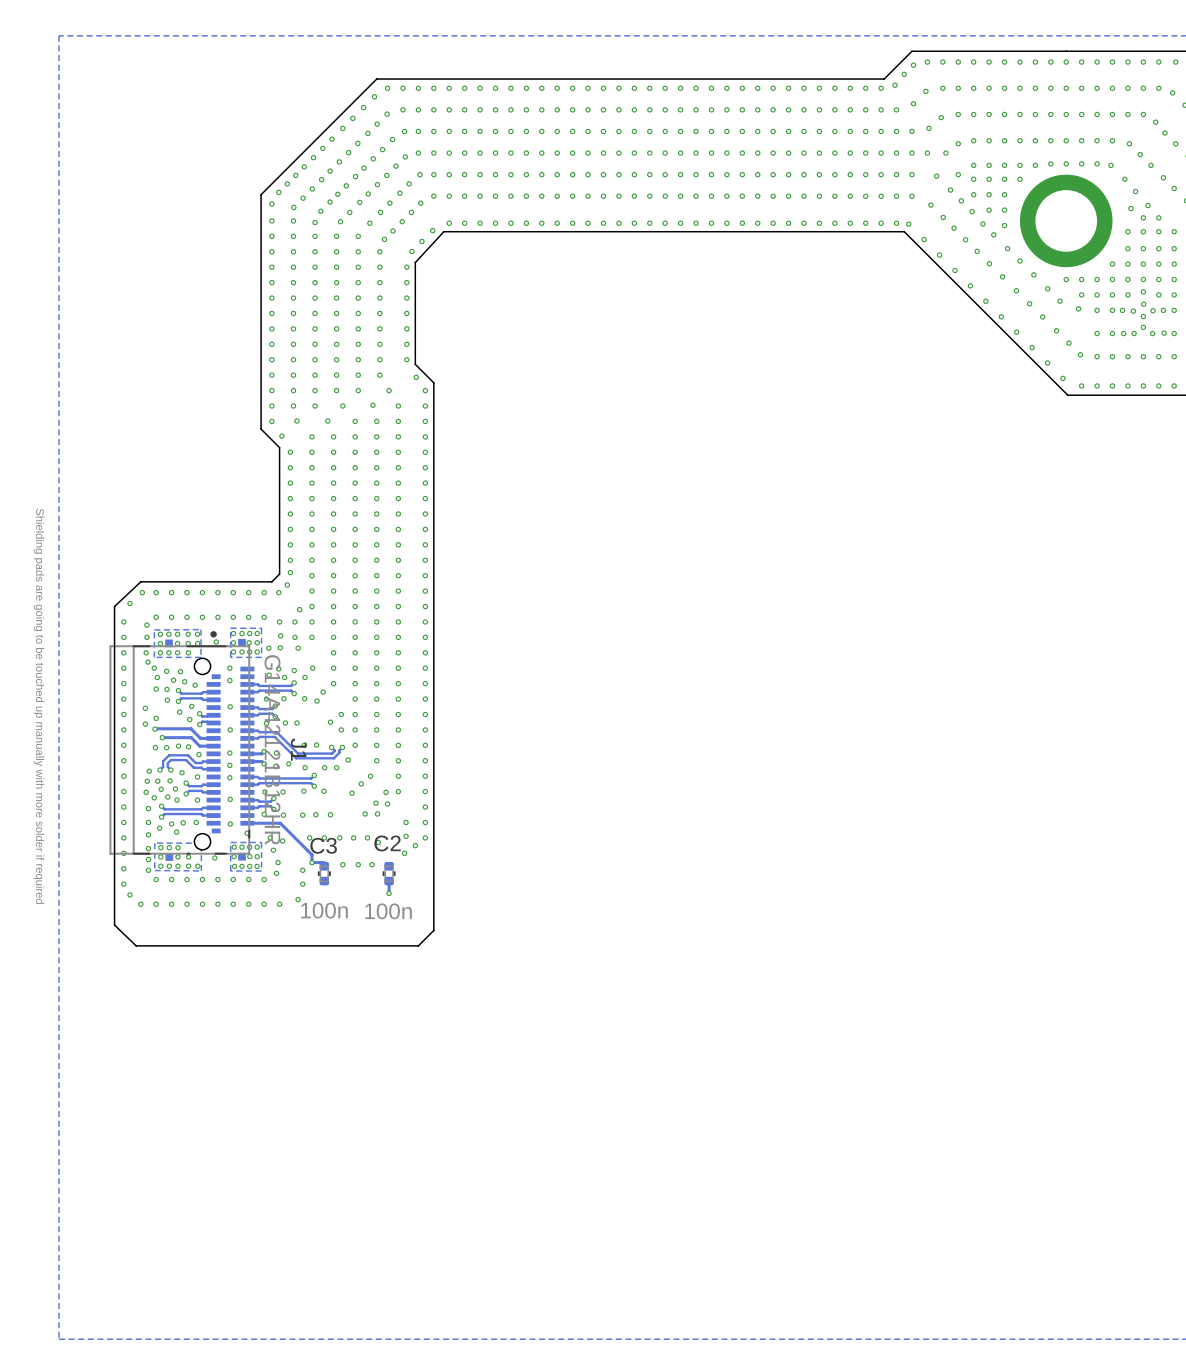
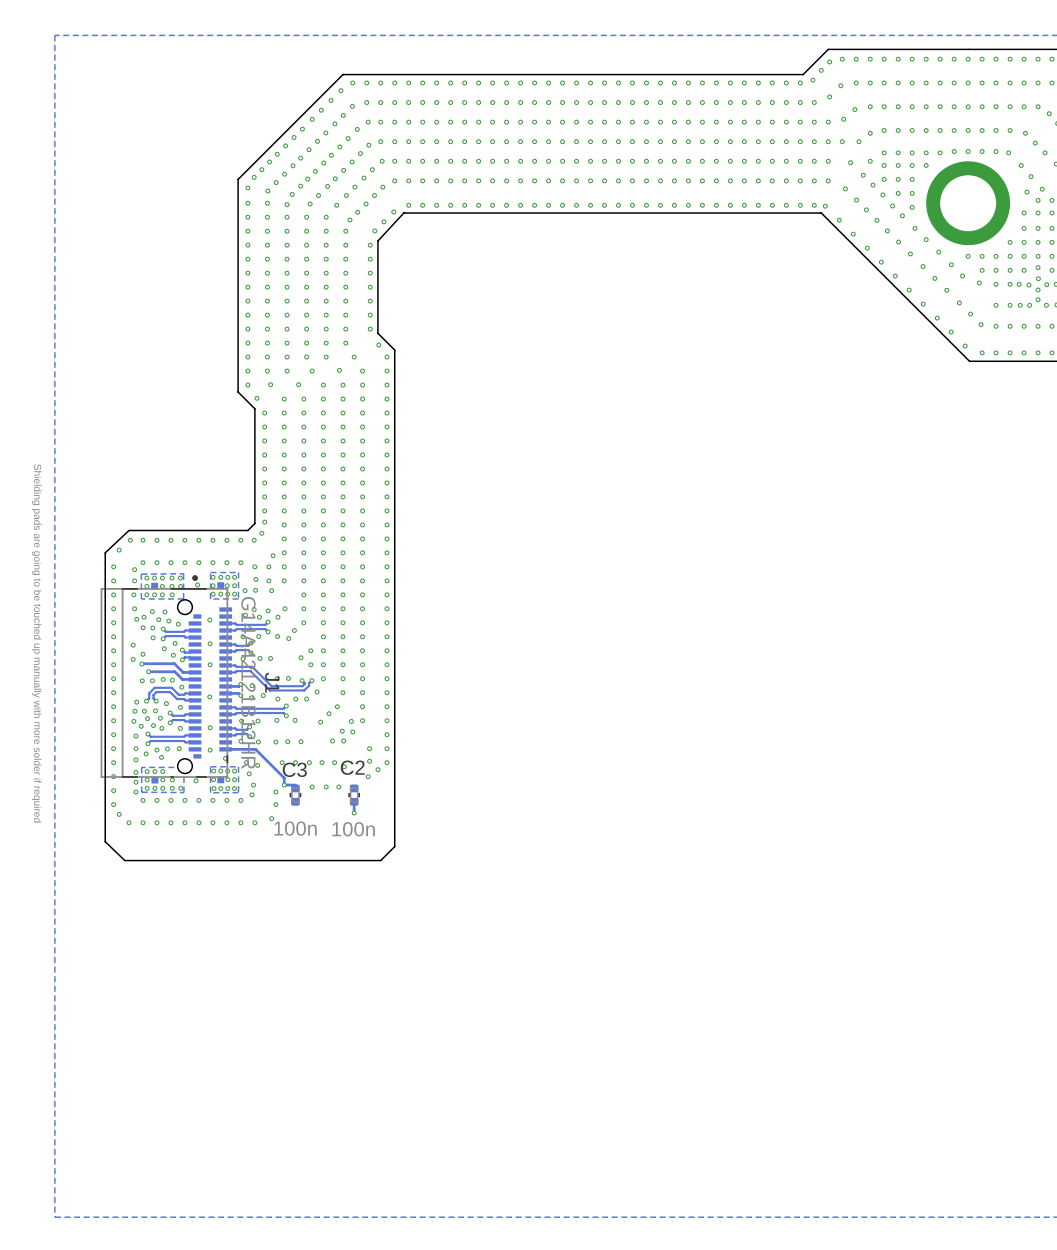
via: (148, 662) -> none
via: none -> (134, 608)
via: (154, 668) -> none
via: (229, 668) -> none
via: none -> (136, 619)
via: (229, 753) -> none
via: (229, 777) -> none

